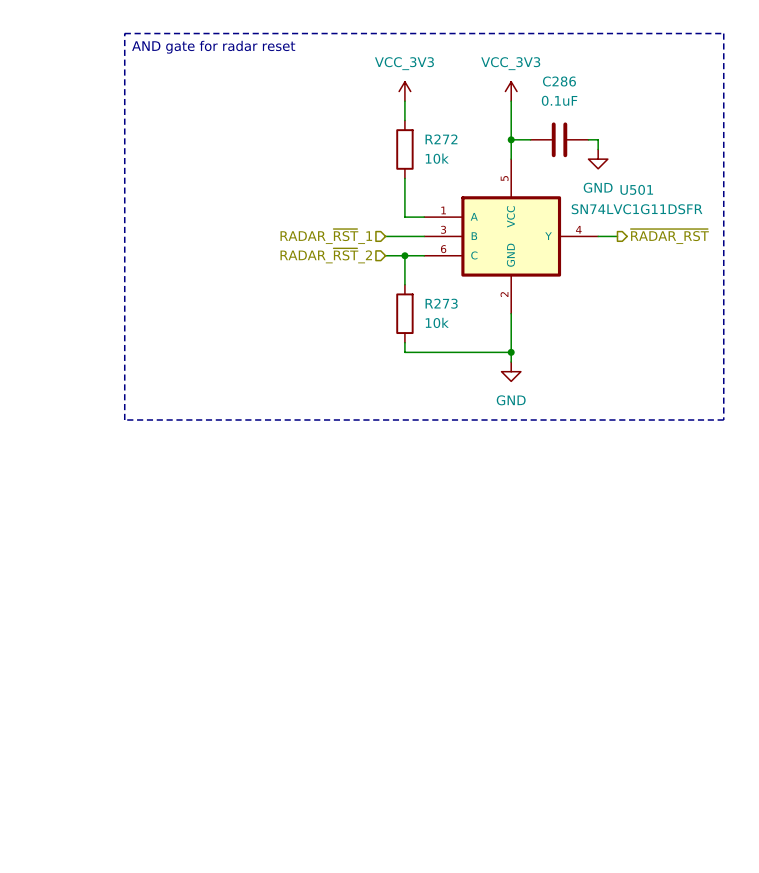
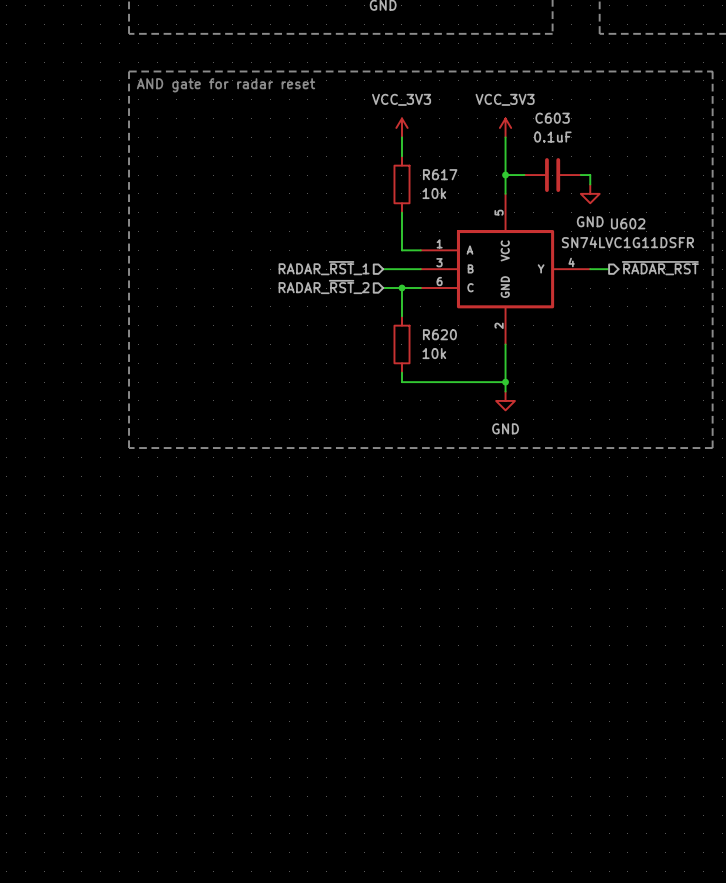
C286 name: C286 (559, 81) -> C603 (552, 118)
R272 name: R272 (441, 139) -> R617 (440, 174)
U501 name: U501 (636, 189) -> U602 (628, 223)
R273 name: R273 (441, 303) -> R620 (439, 334)

